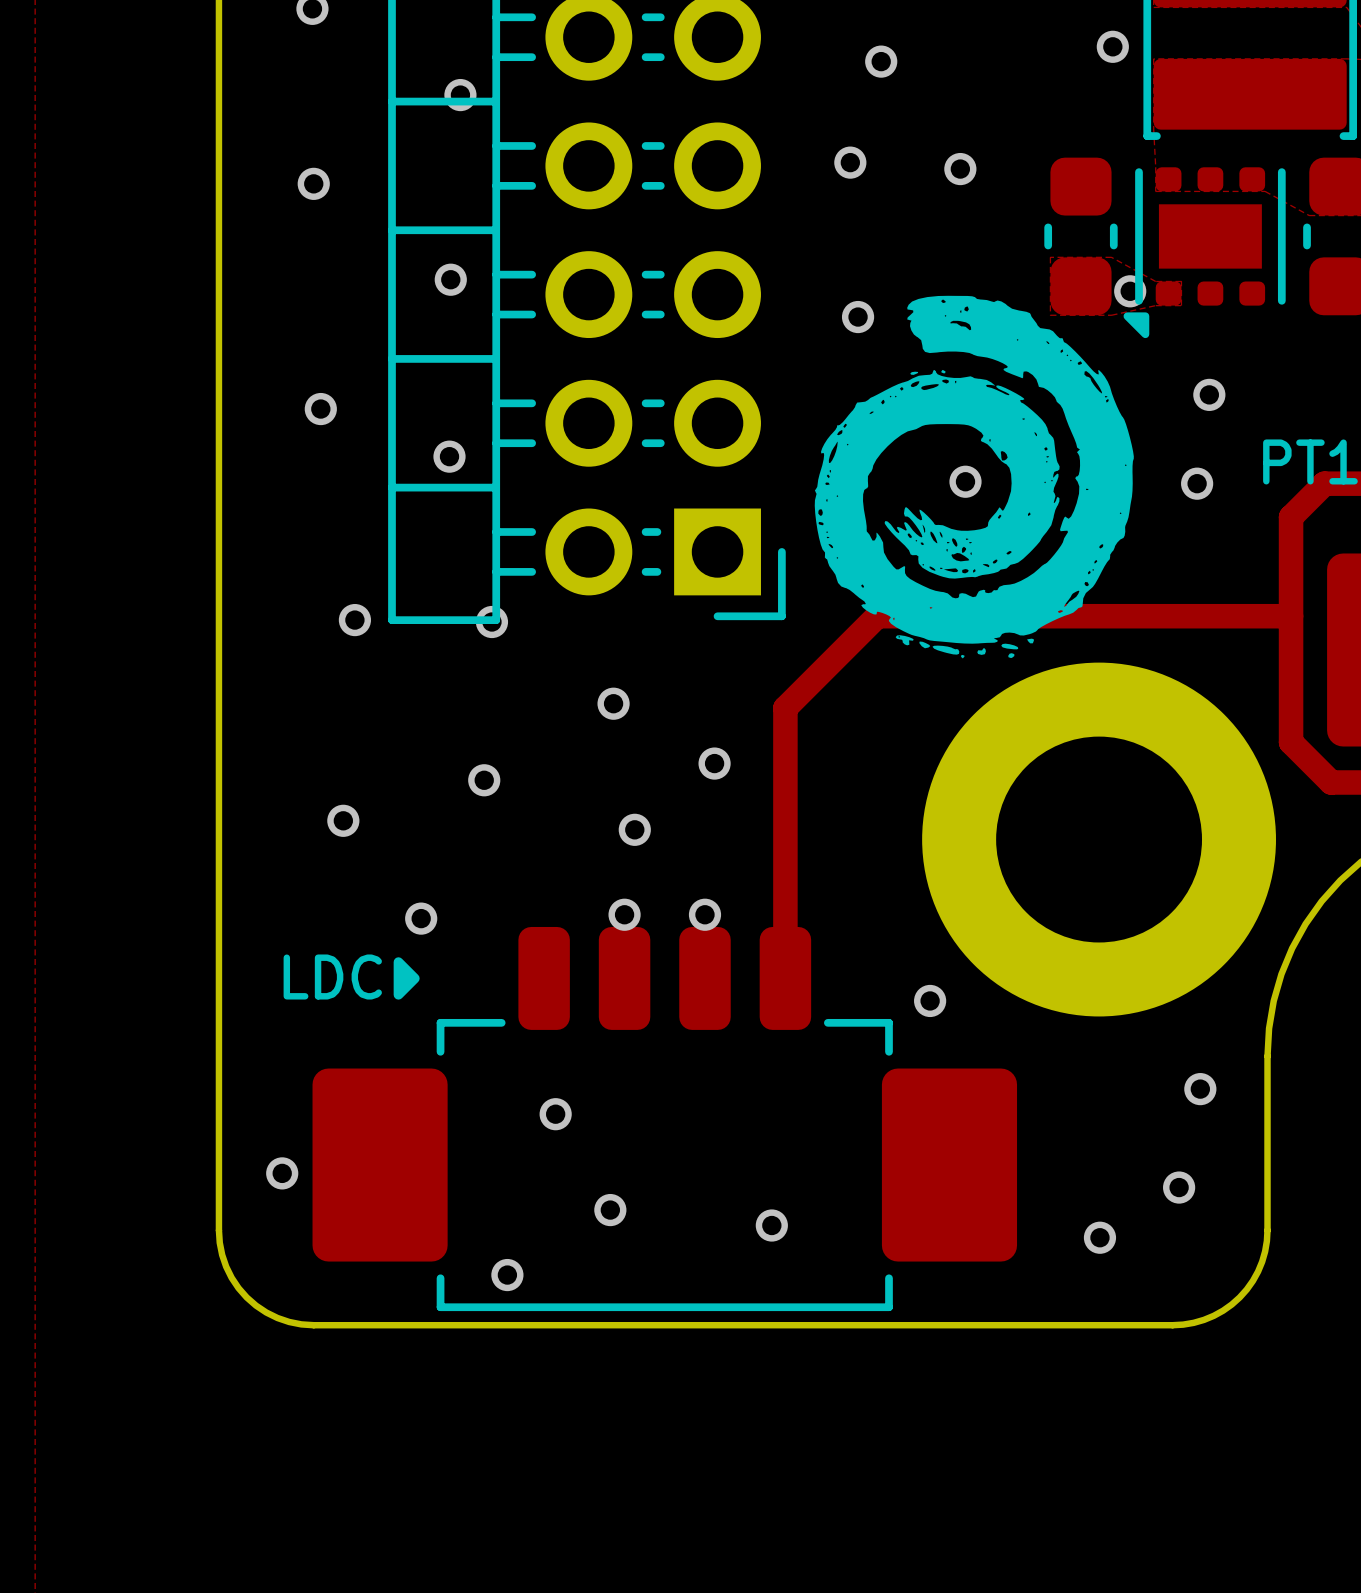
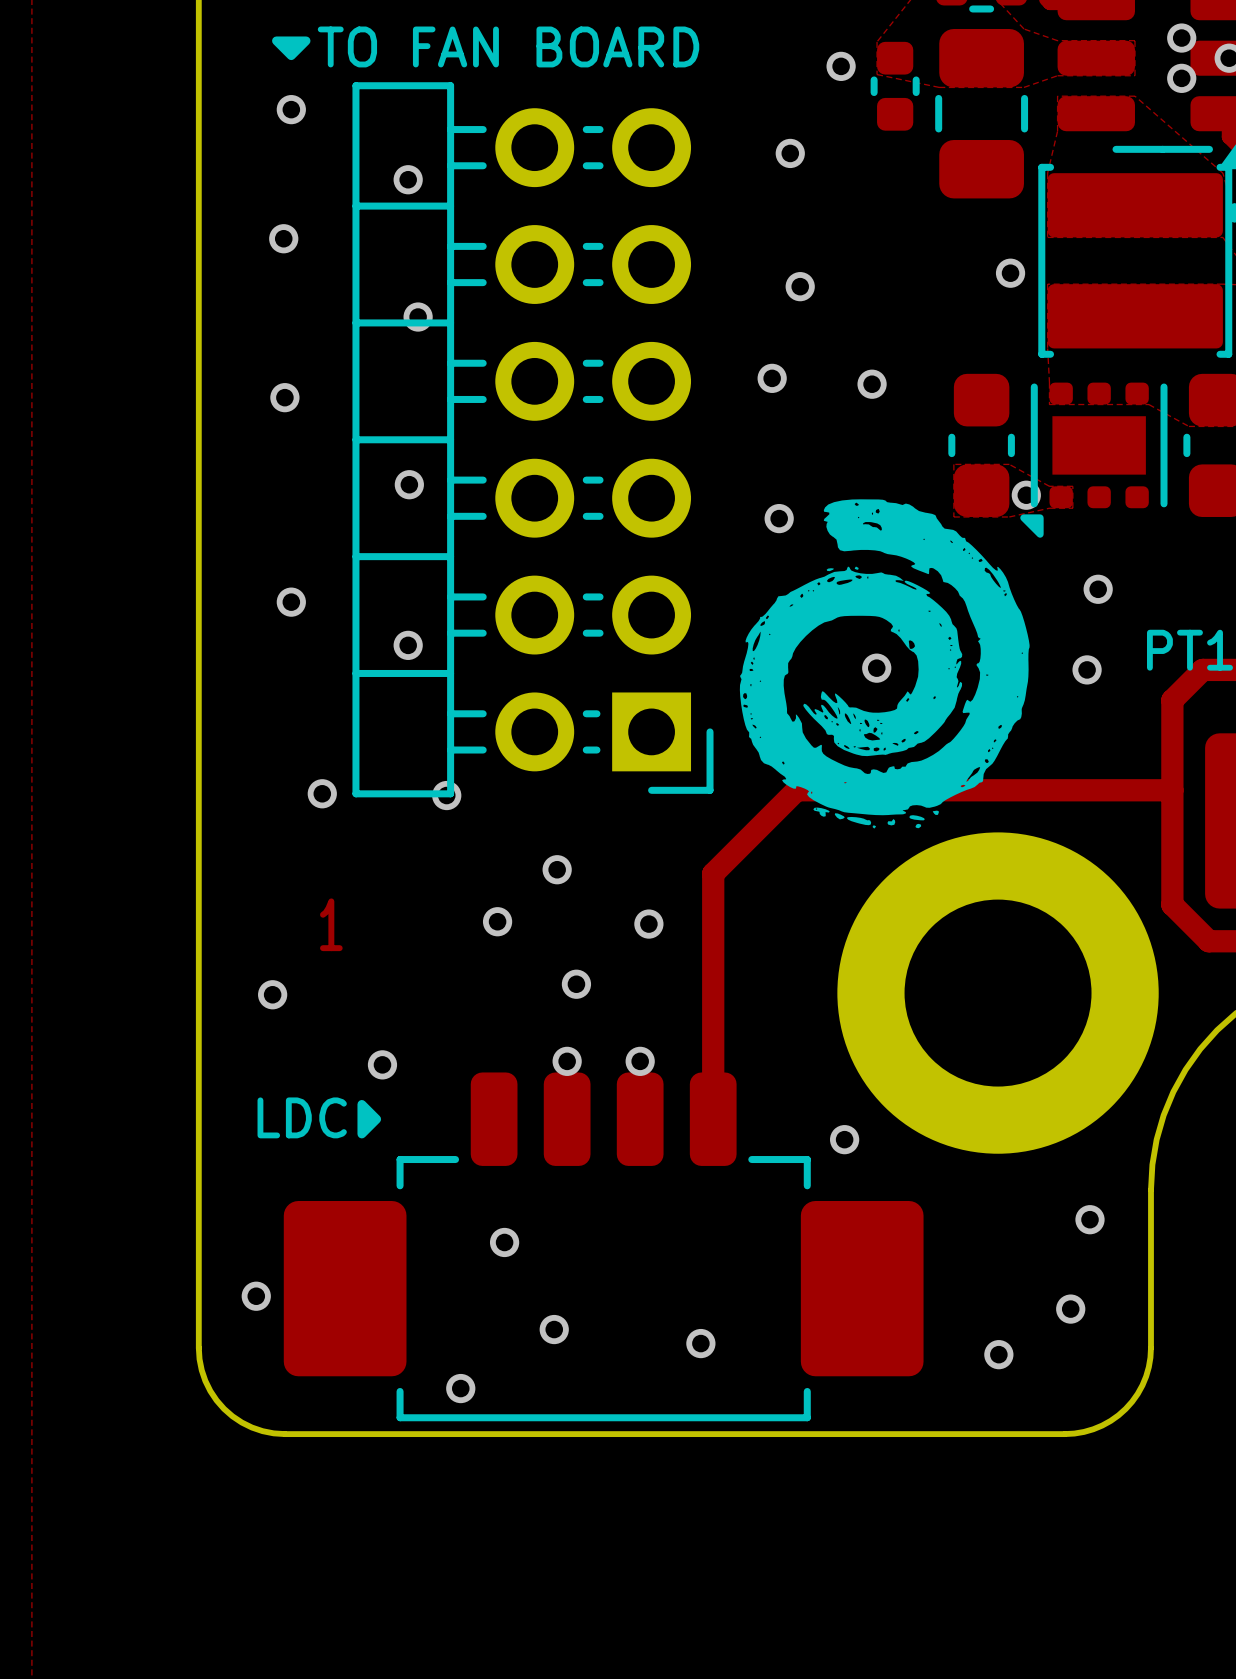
text: none -> 1 (331, 924)
via position: (484, 780) -> (497, 921)
via position: (343, 820) -> (272, 994)

